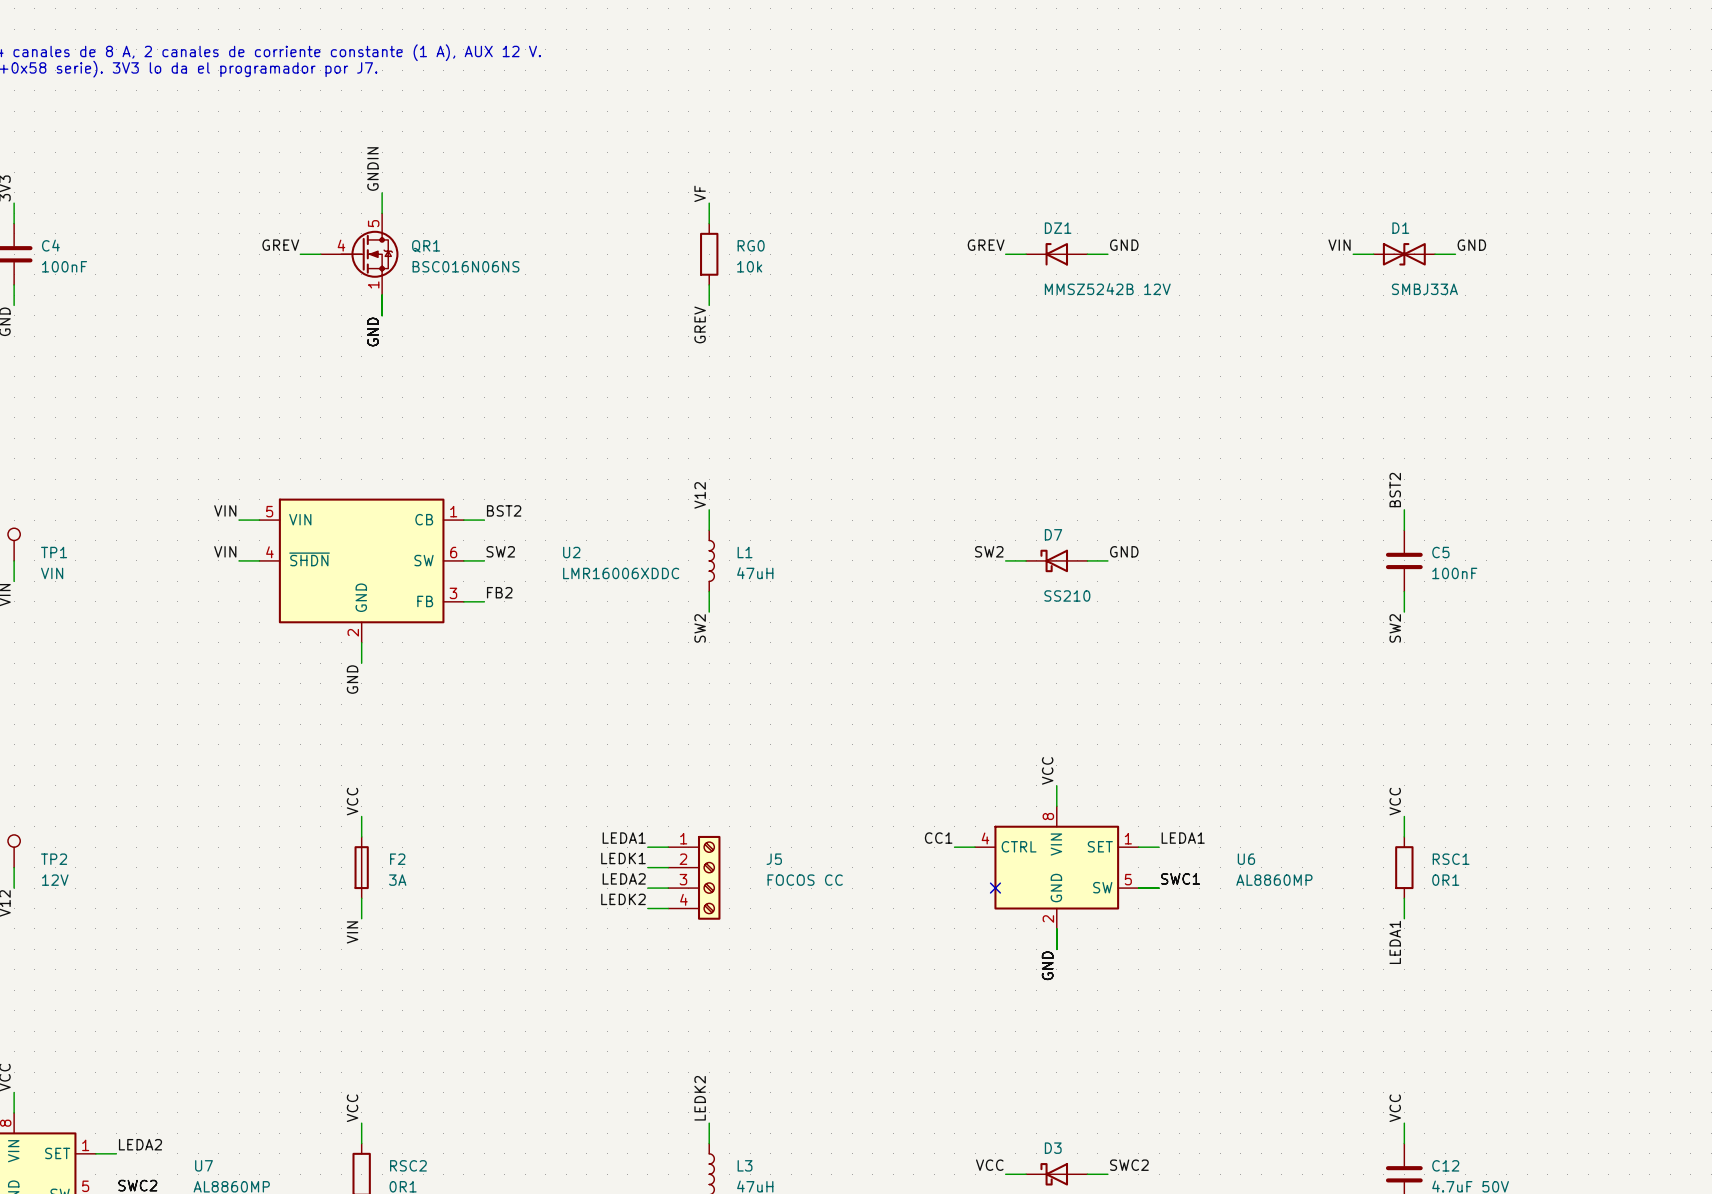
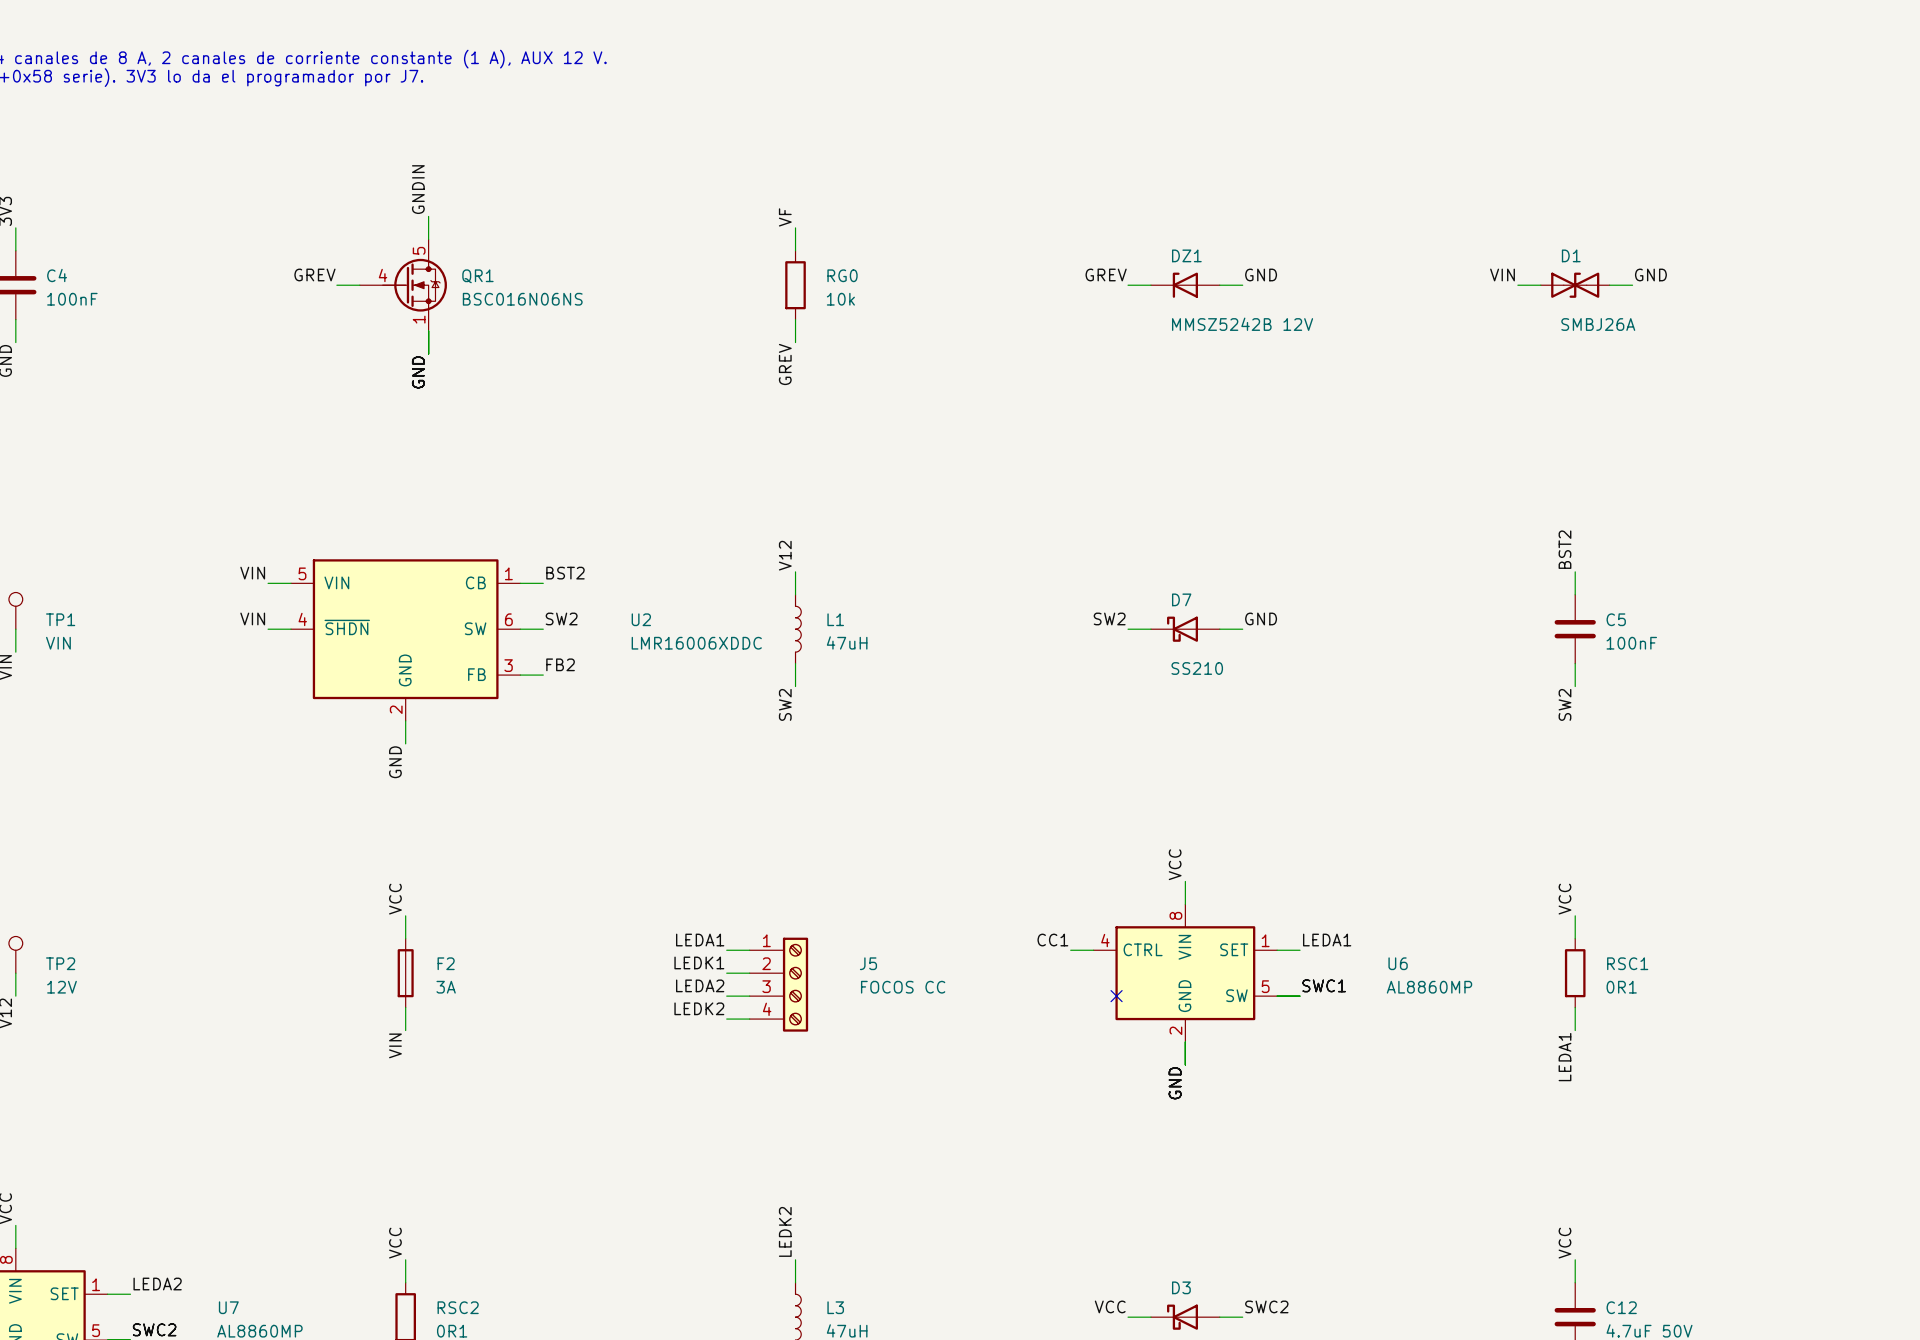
D1 value: SMBJ33A (1424, 289) -> SMBJ26A (1598, 324)

